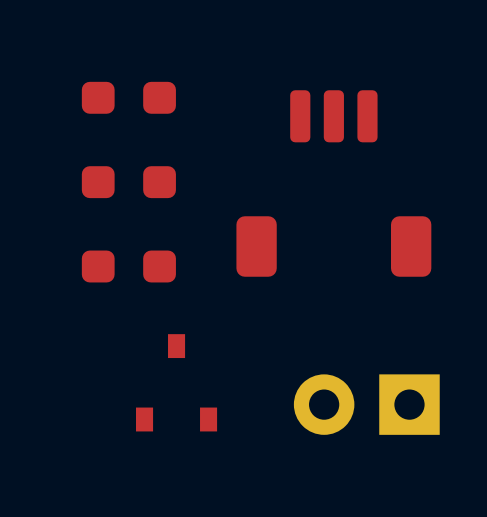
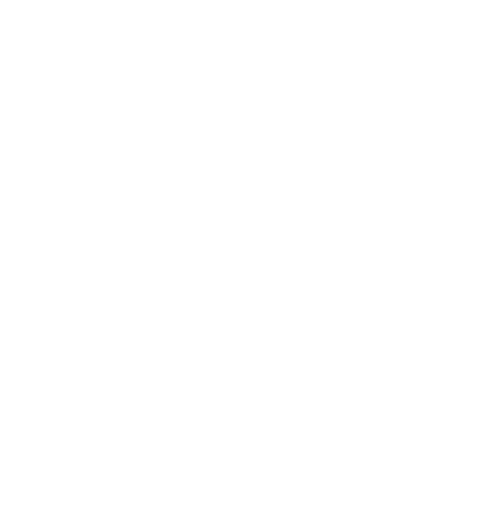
part: (128, 97) -> none
part: (128, 182) -> none
part: (333, 183) -> none
part: (128, 266) -> none
part: (176, 382) -> none
part: (366, 404) -> none

